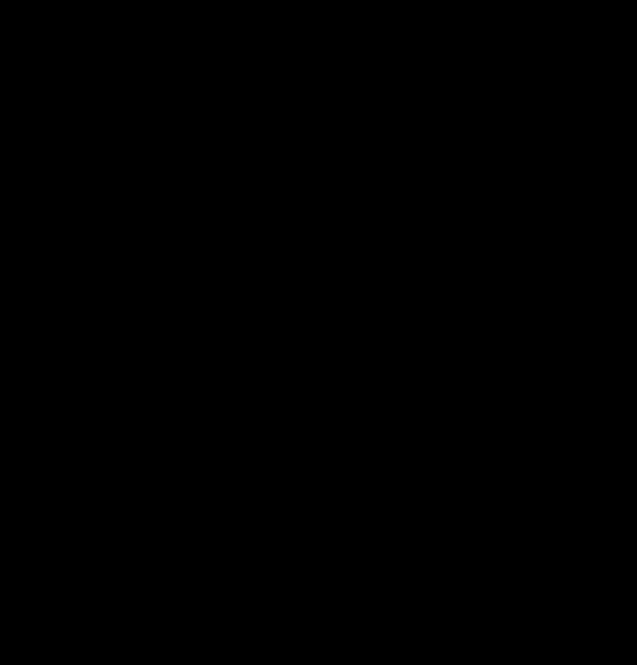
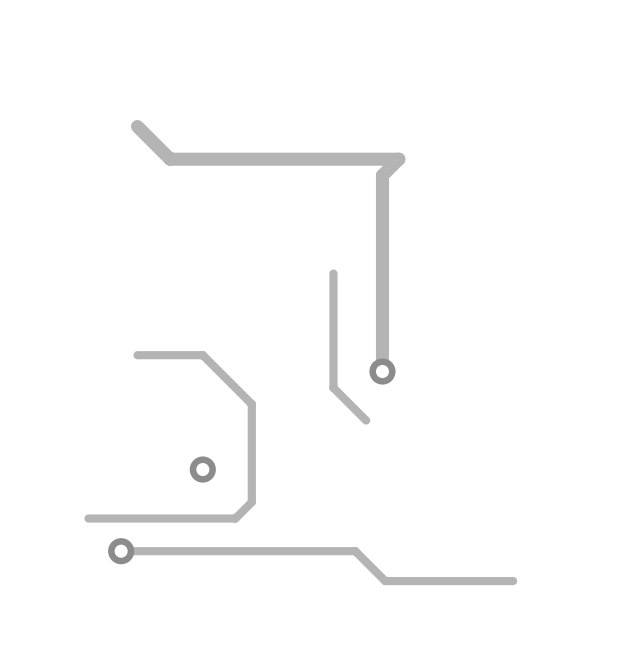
track: none -> (137, 126) (170, 159) (398, 159) (382, 175) (382, 371)
track: none -> (333, 273) (333, 387) (366, 420)
track: none -> (137, 355) (202, 355) (251, 404) (251, 502) (235, 518) (88, 518)
via: none -> (382, 371)
via: none -> (202, 469)
track: none -> (121, 551) (355, 551) (385, 581) (513, 581)
via: none -> (121, 551)

